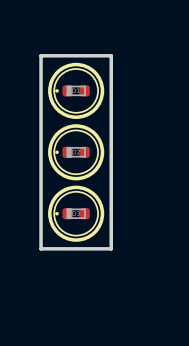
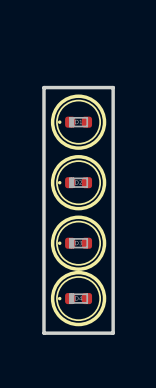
drawing: none -> [50, 270, 107, 327]
board edge: (41, 248) (111, 248) -> (43, 277) (43, 333) (113, 333) (113, 277)
part: none -> (75, 298)

